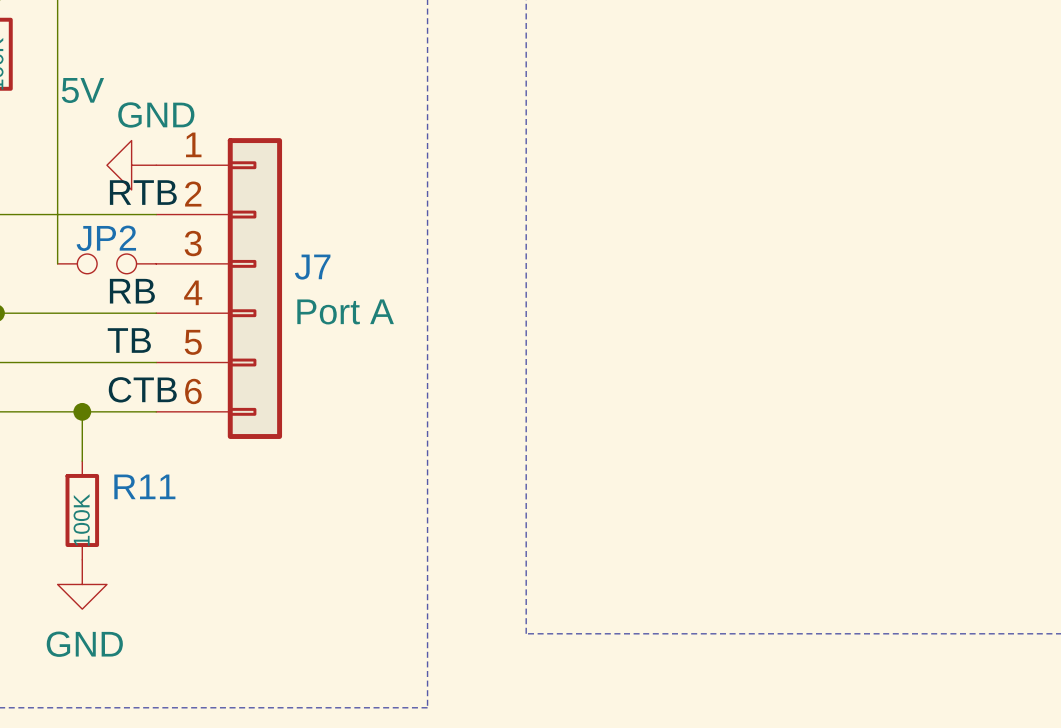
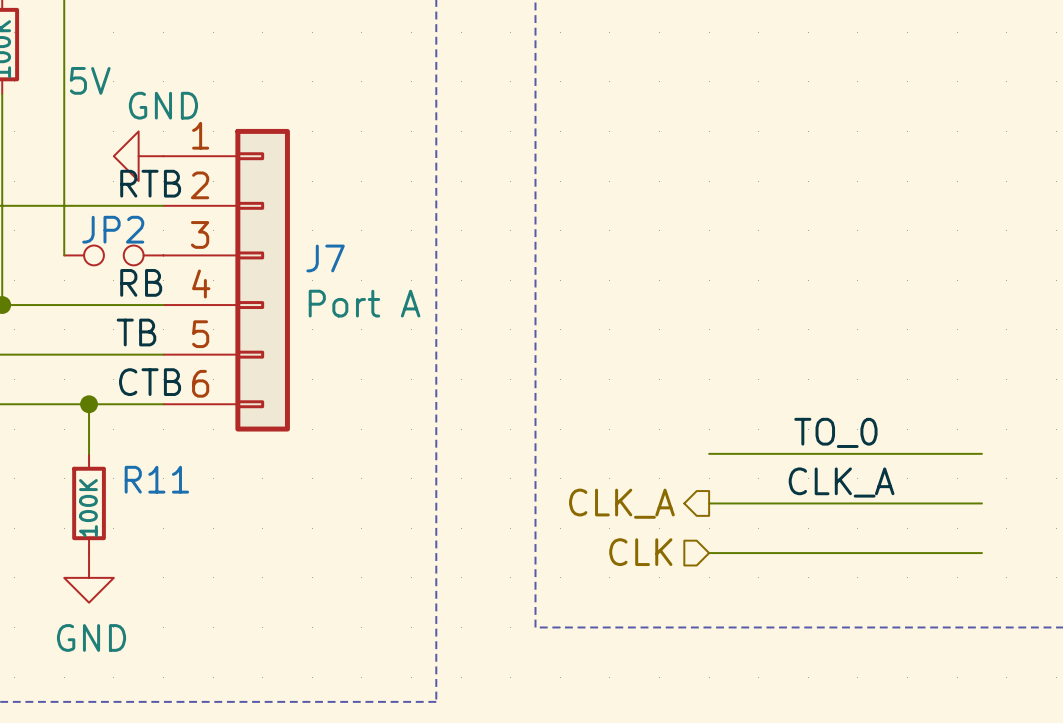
label: none -> TO_0 (835, 432)
wire: none -> (709, 453) (981, 453)
label: none -> CLK_A (841, 482)
wire: none -> (709, 503) (981, 503)
hierarchical label: none -> CLK_A (621, 503)
hierarchical label: none -> CLK (640, 552)
wire: none -> (709, 553) (981, 553)

